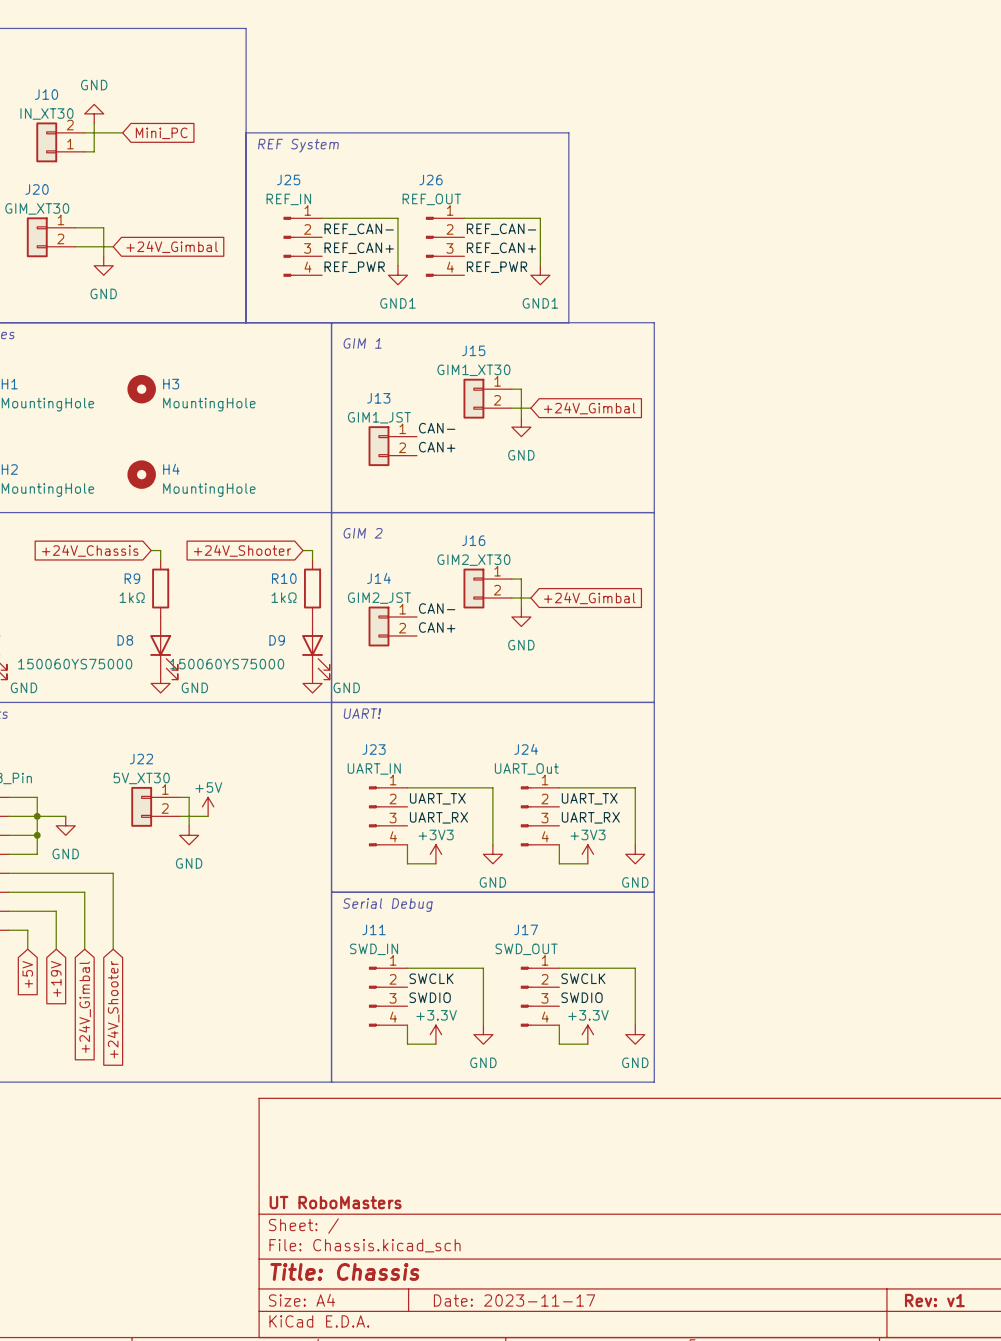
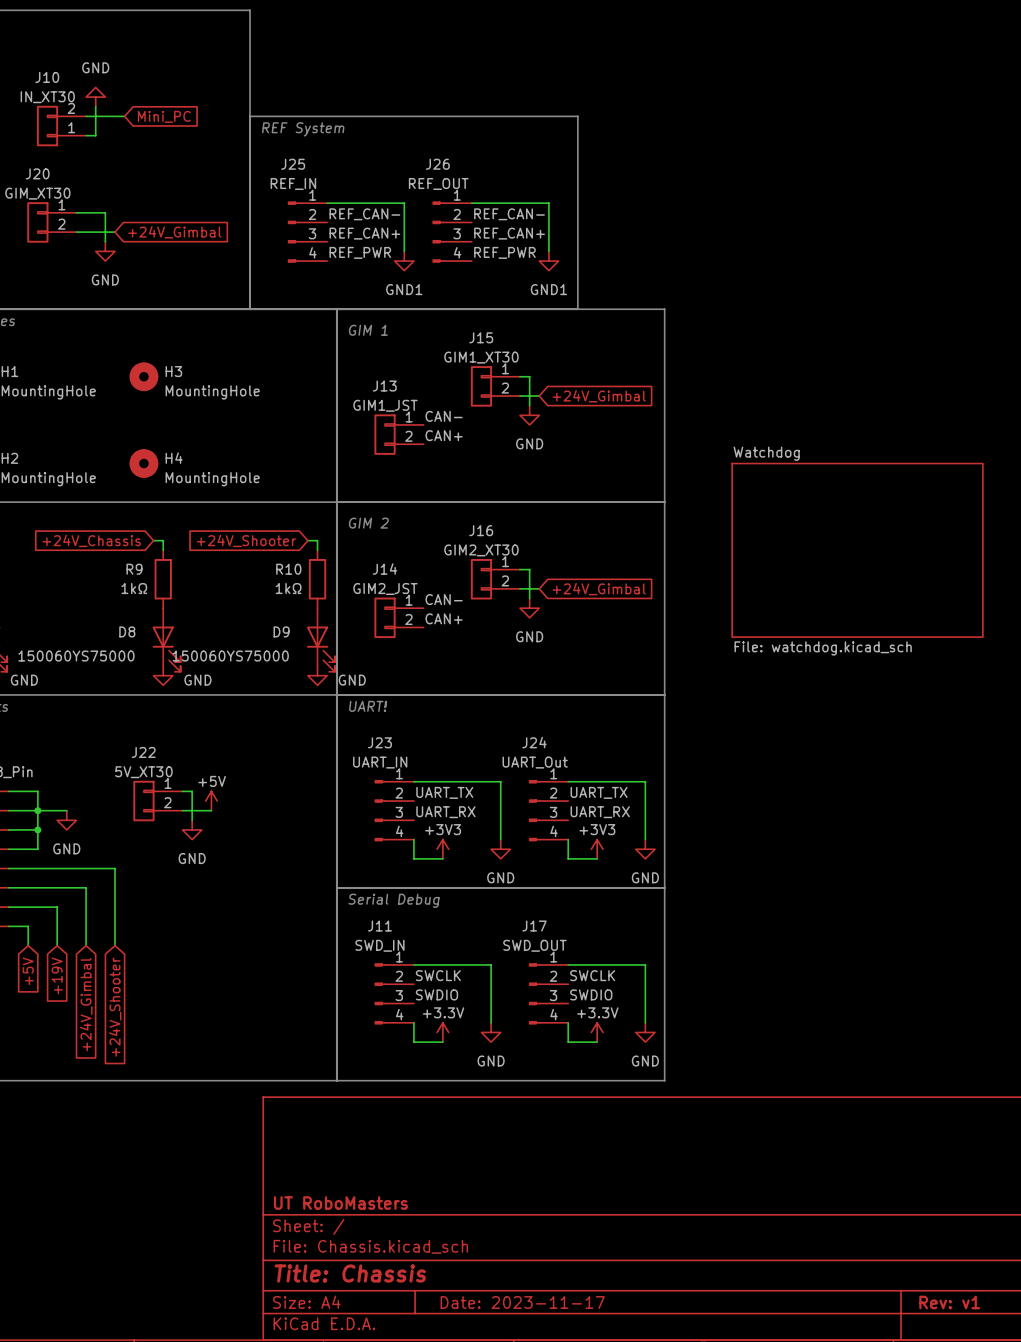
sheet Watchdog: none -> File: watchdog.kicad_sch (857, 550)

